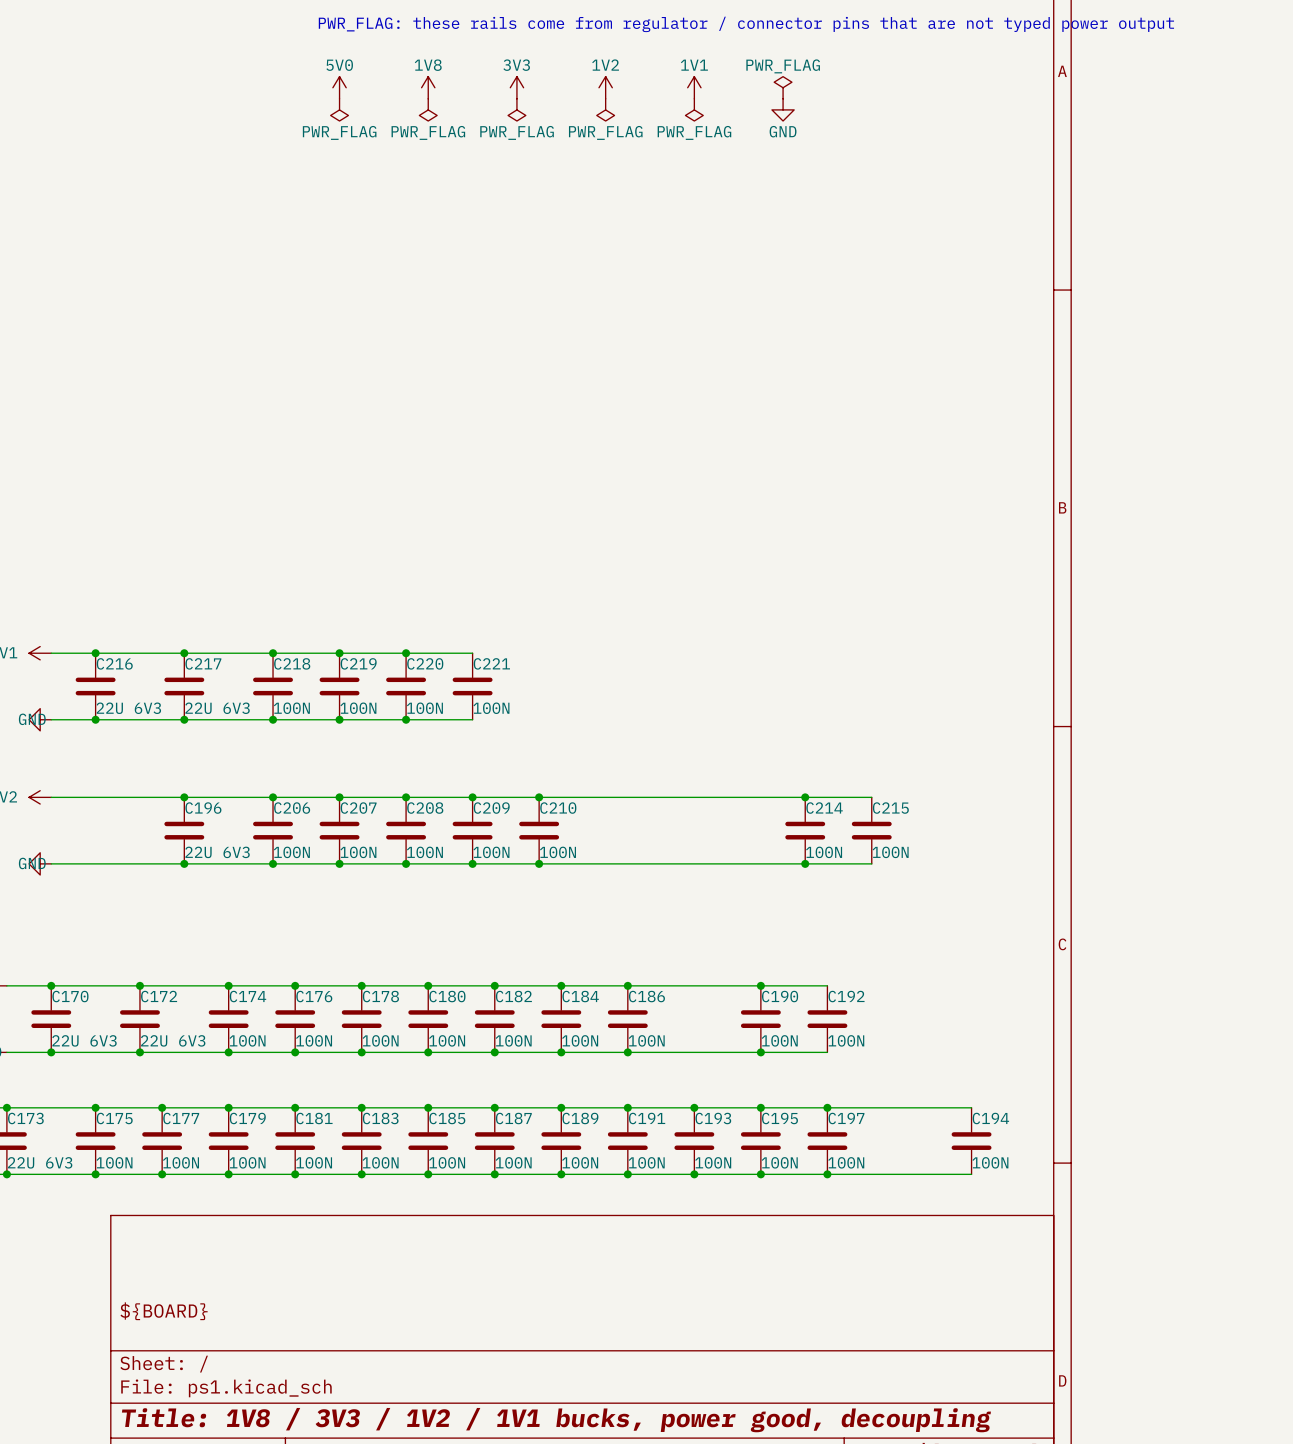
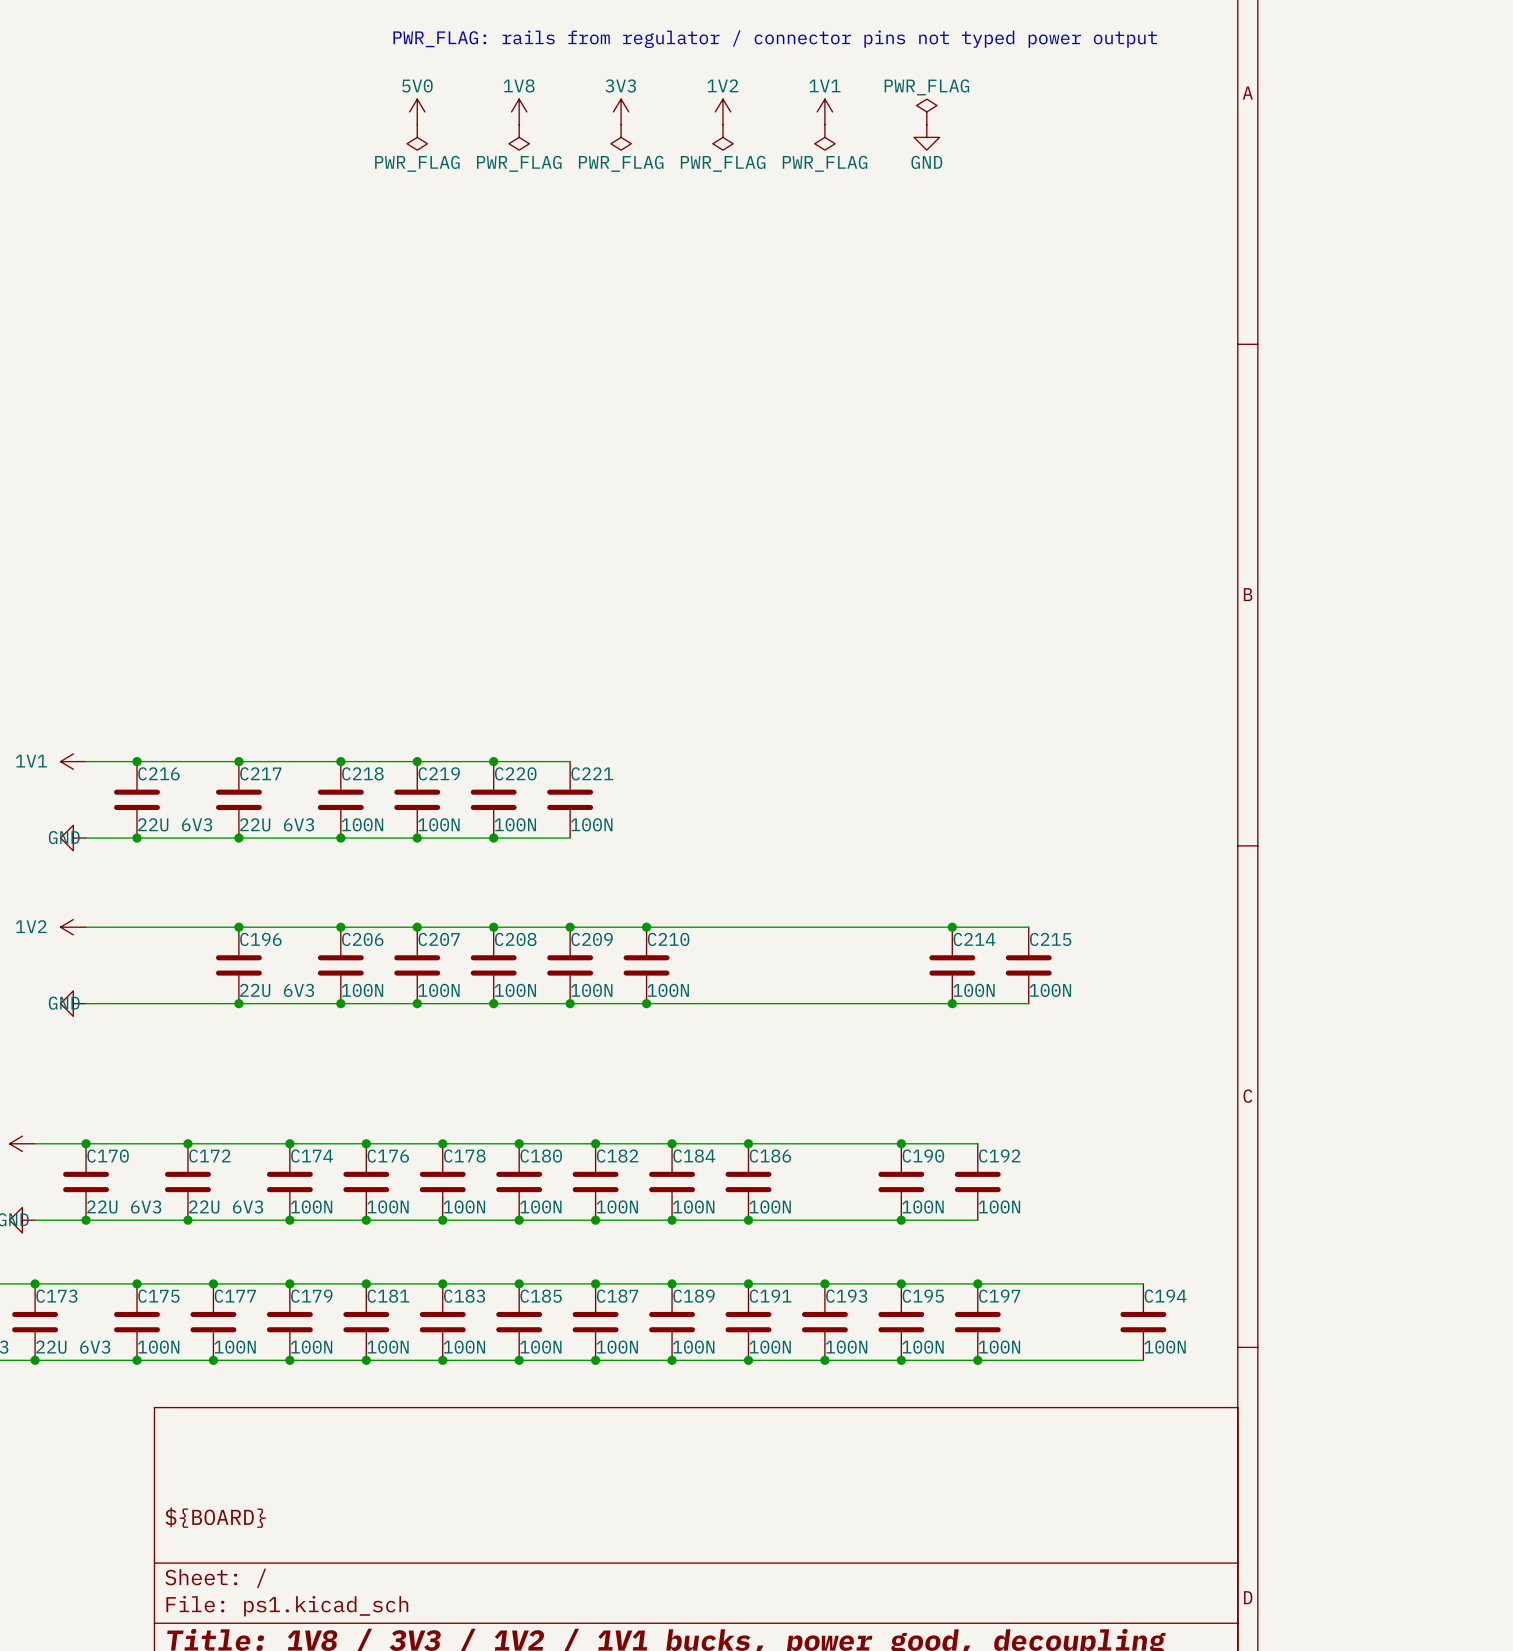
text: PWR_FLAG: these rails come from regulator / connector pins that are not typed power output (746, 24) -> PWR_FLAG: rails from regulator / connector pins not typed power output (775, 39)

